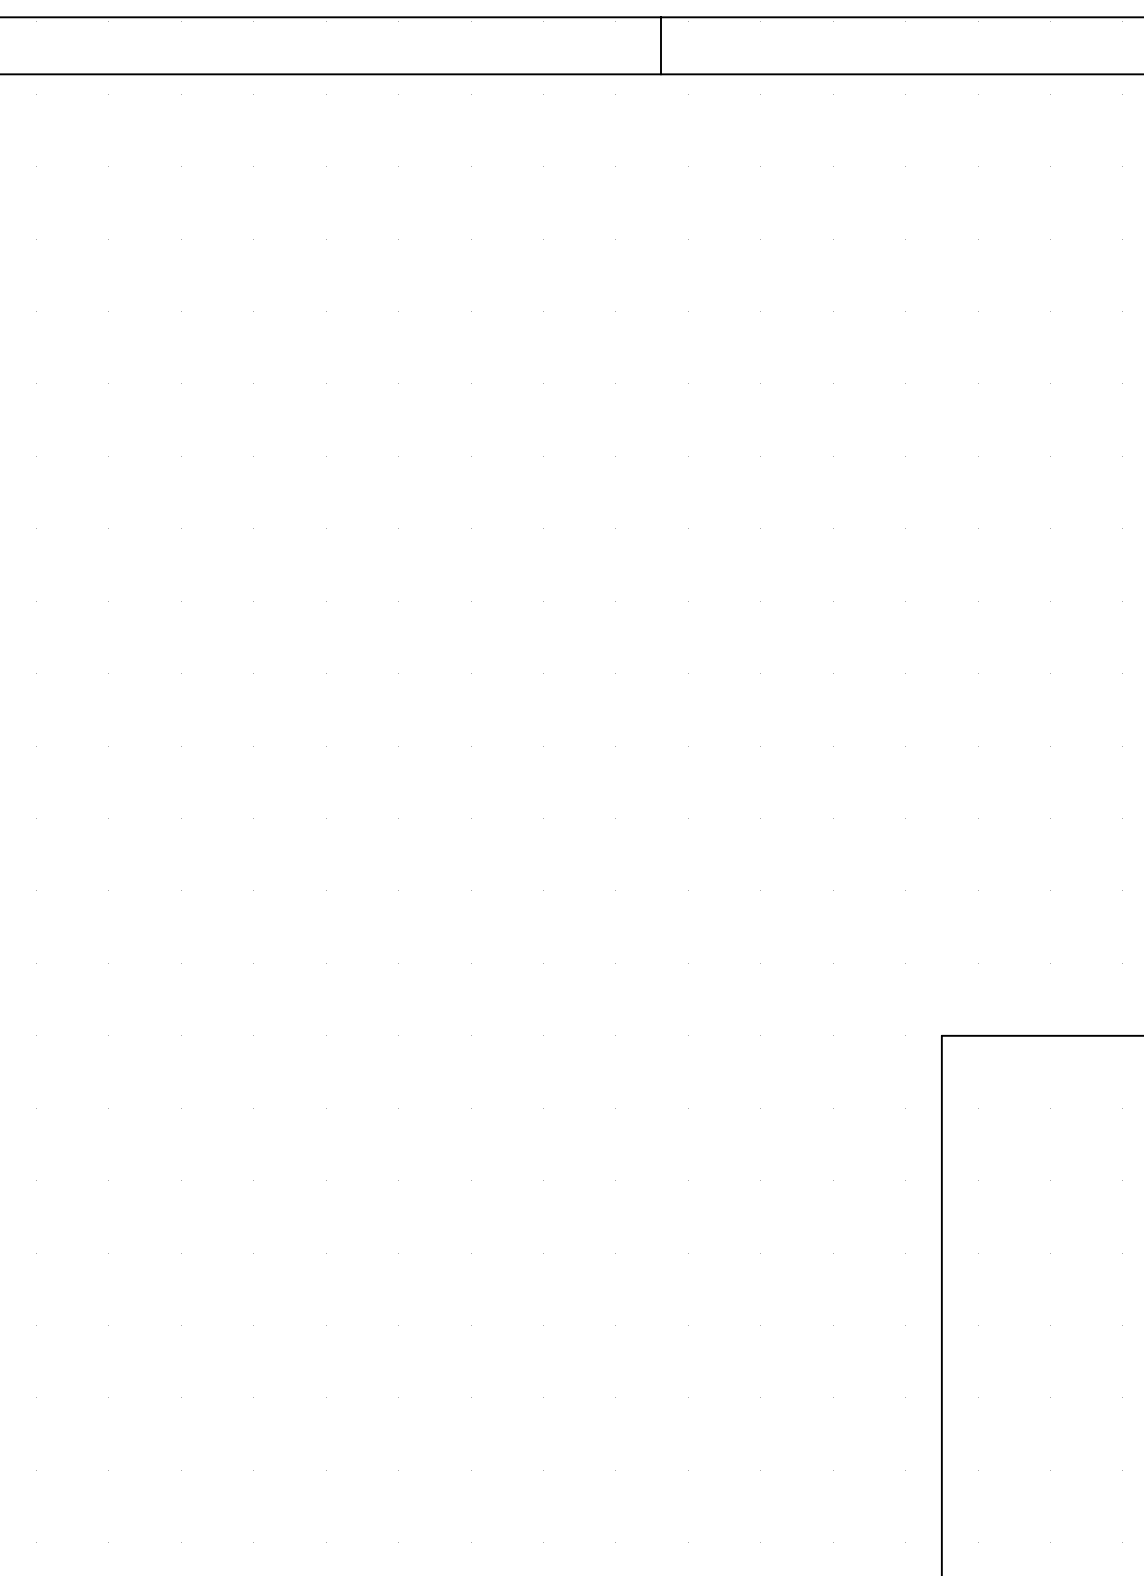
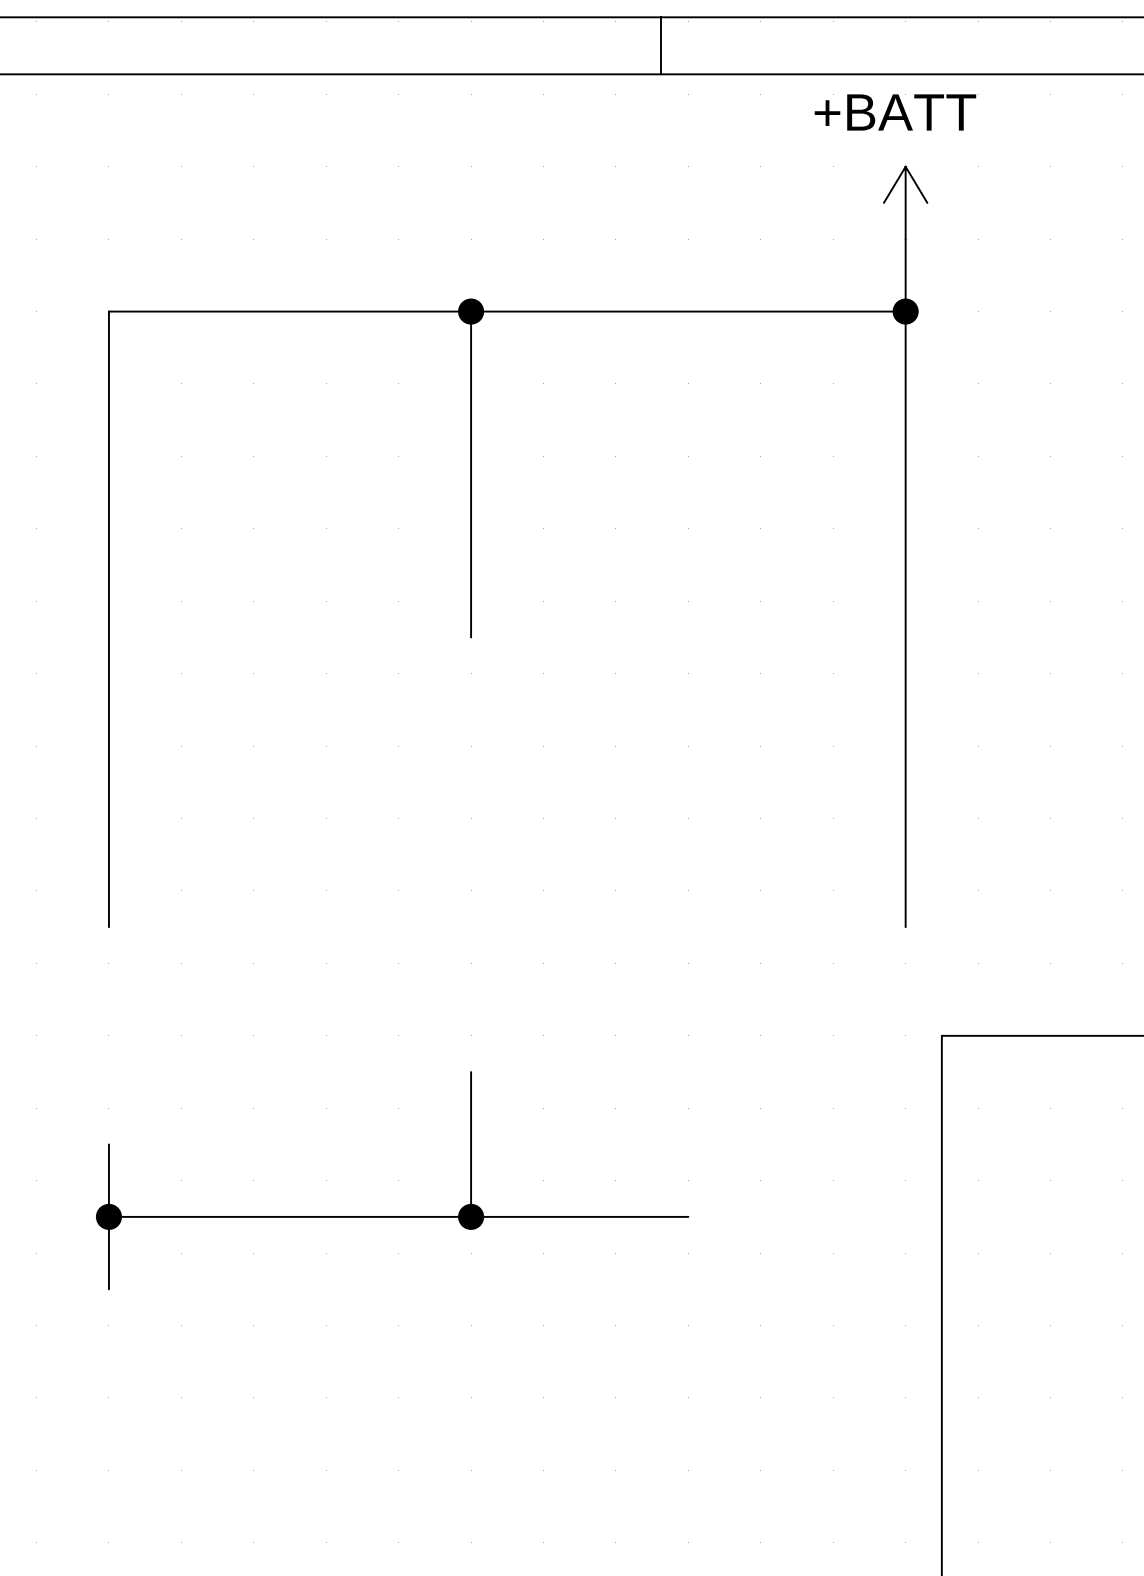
power symbol: none -> +BATT (905, 202)
wire: none -> (905, 239) (905, 927)
wire: none -> (471, 311) (471, 637)
junction: none -> (471, 311)
wire: none -> (905, 311) (108, 311) (108, 927)
junction: none -> (905, 311)
wire: none -> (471, 1072) (471, 1216)
wire: none -> (108, 1144) (108, 1289)
wire: none -> (108, 1216) (688, 1216)
junction: none -> (108, 1216)
junction: none -> (471, 1216)

